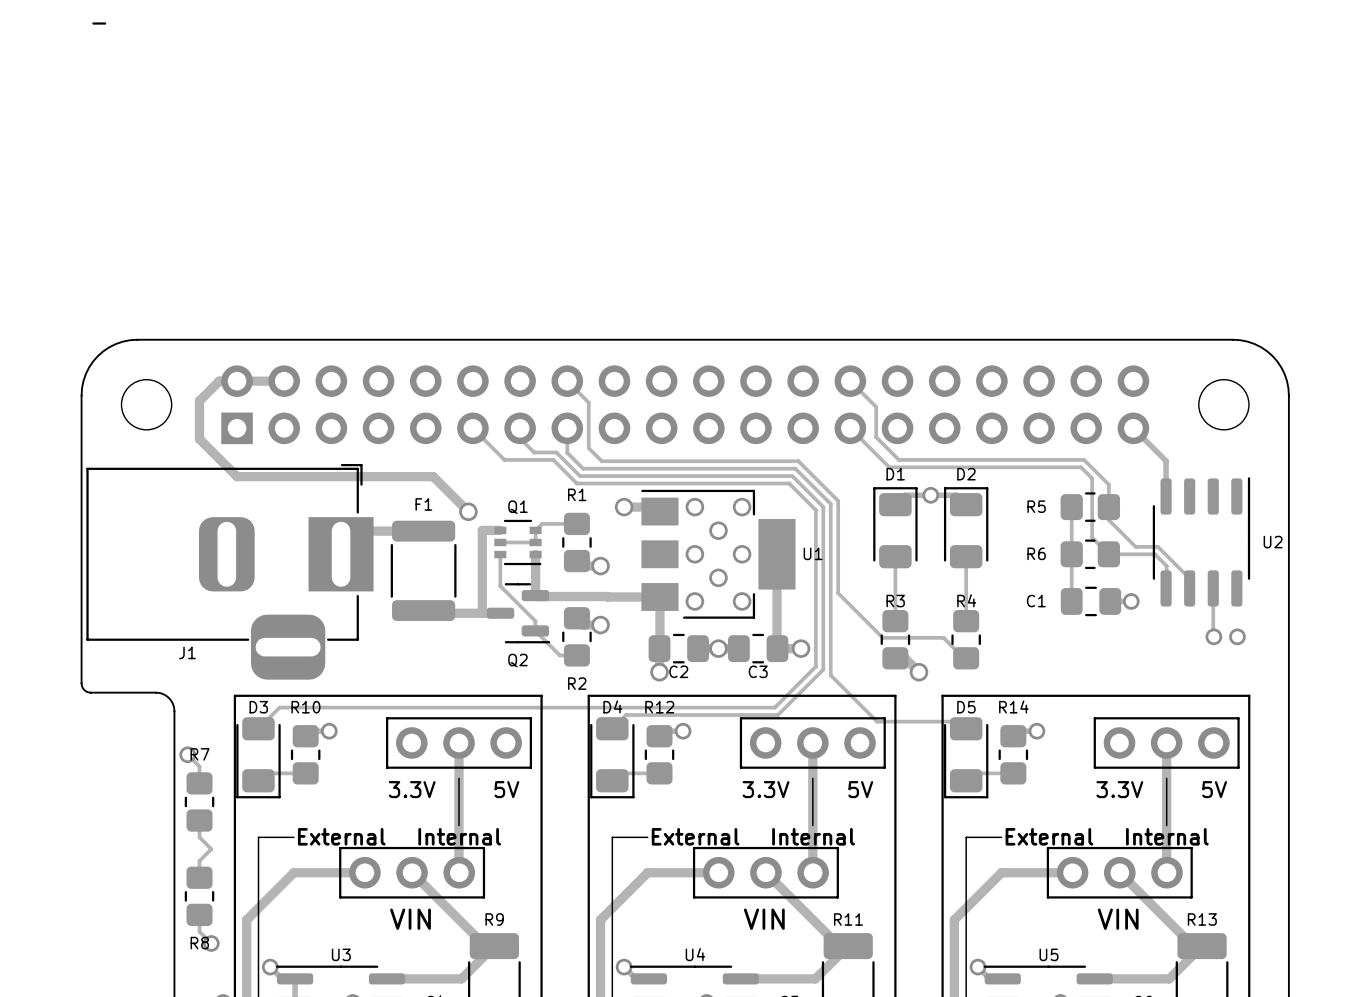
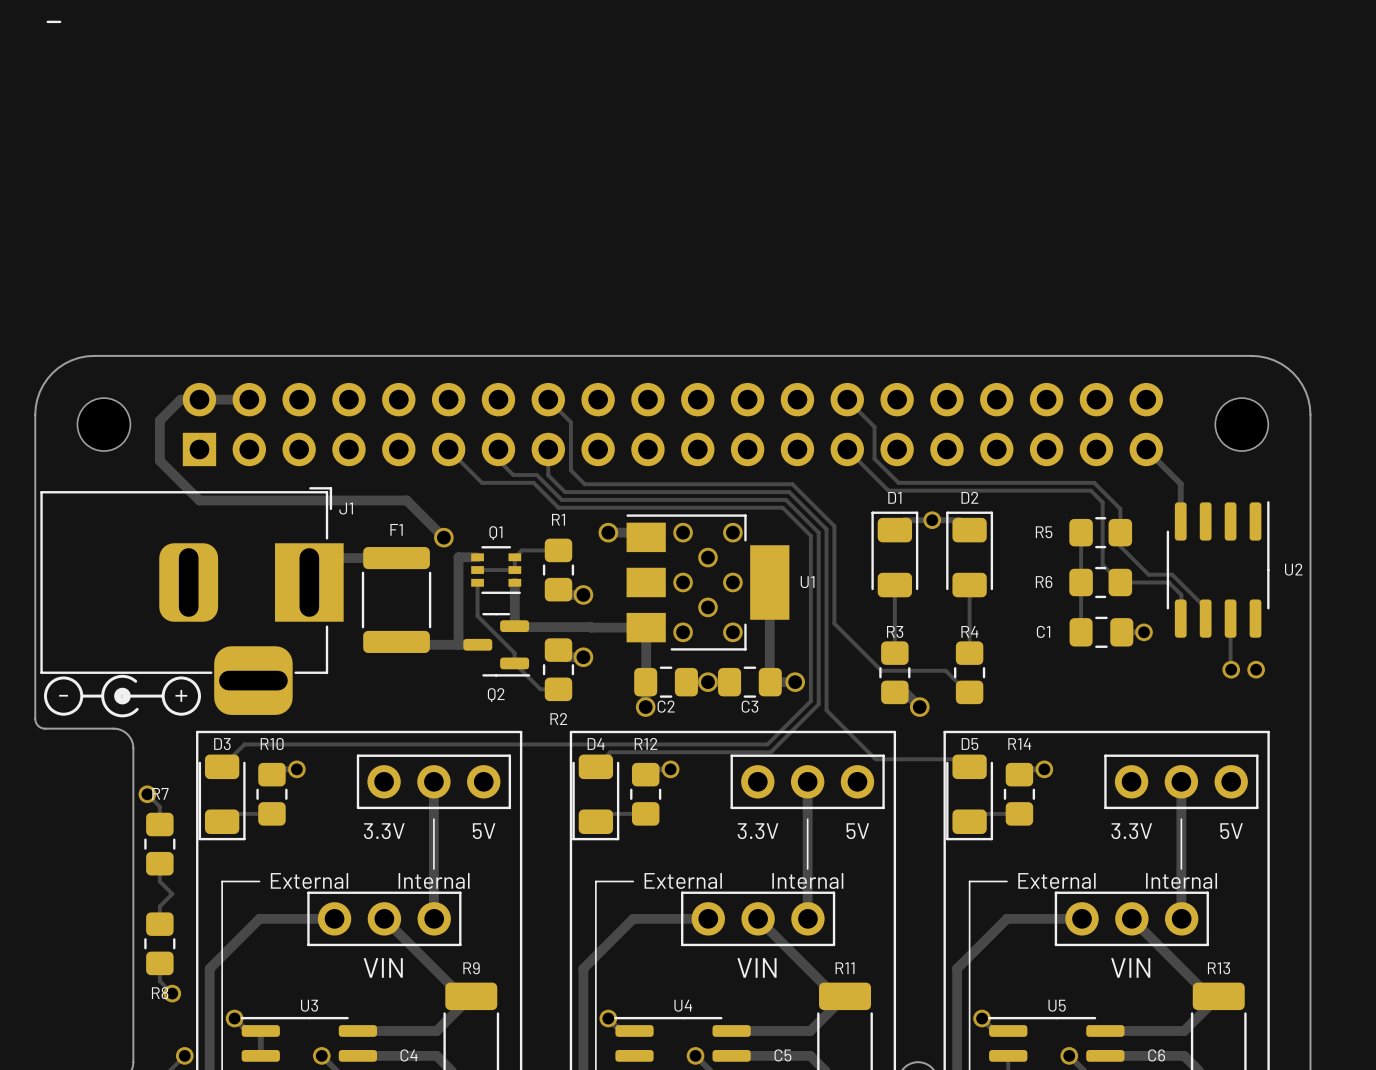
drawing: none -> [44, 674, 201, 718]
J1 name position: J1 (187, 652) -> J1 (346, 508)

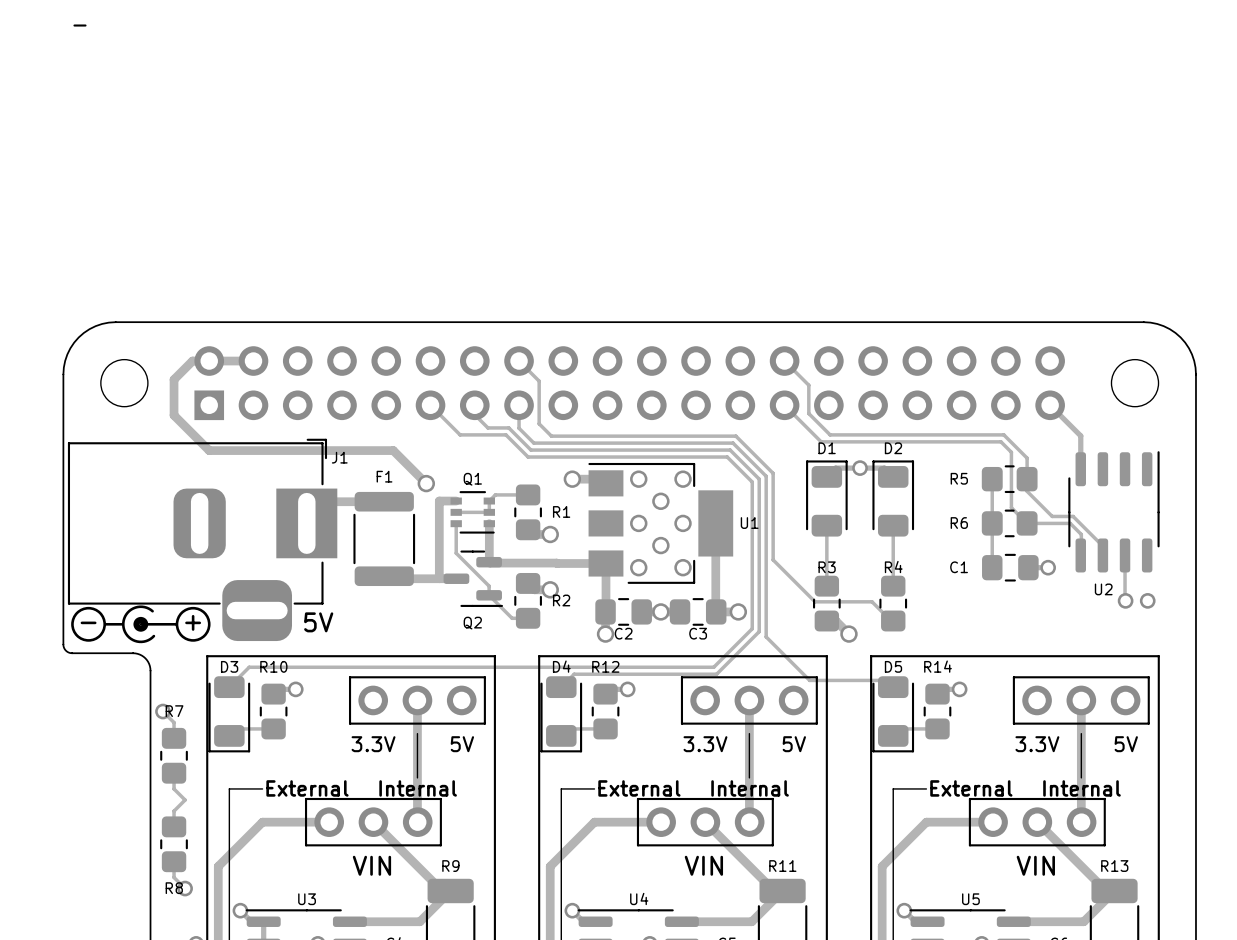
R1 name position: R1 (558, 519) -> R1 (561, 511)
U2 name position: U2 (1293, 569) -> U2 (1103, 589)
text: none -> 5V (318, 622)
R2 name position: R2 (558, 719) -> R2 (561, 600)

